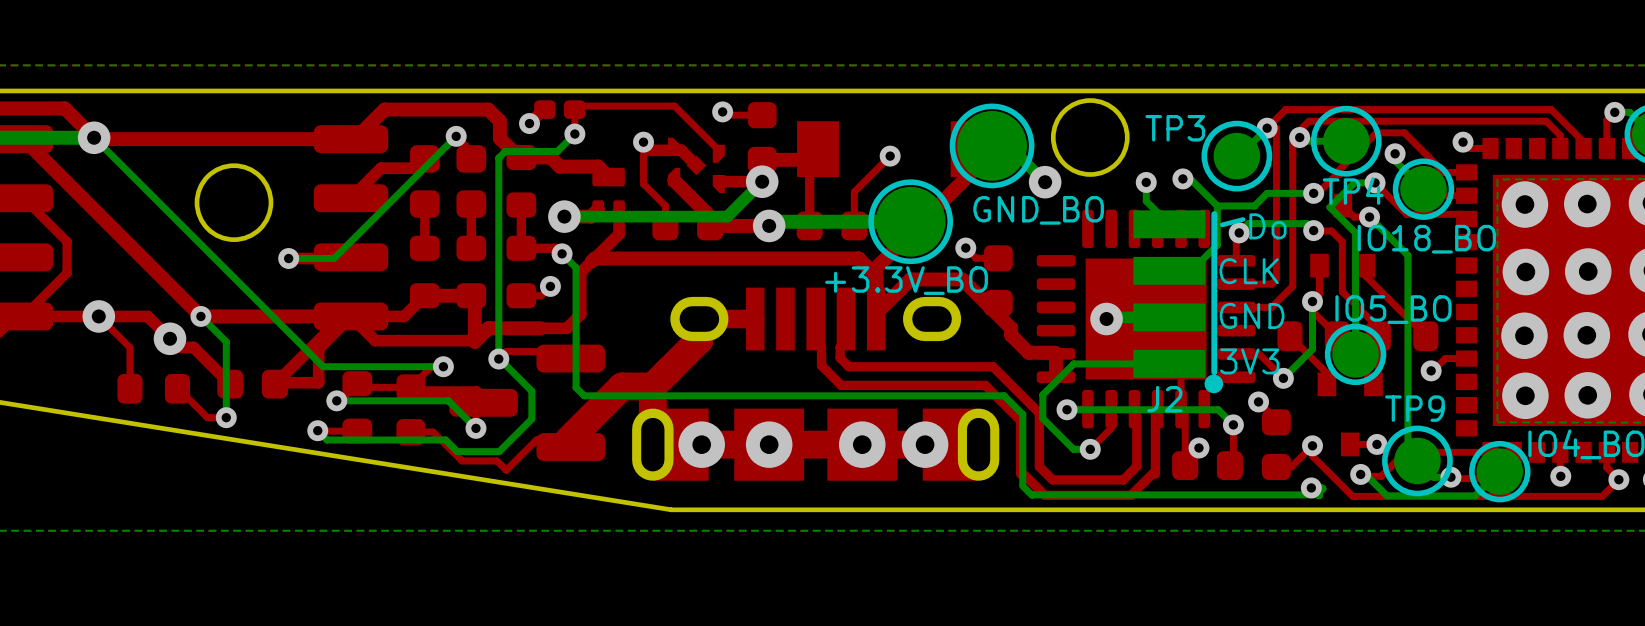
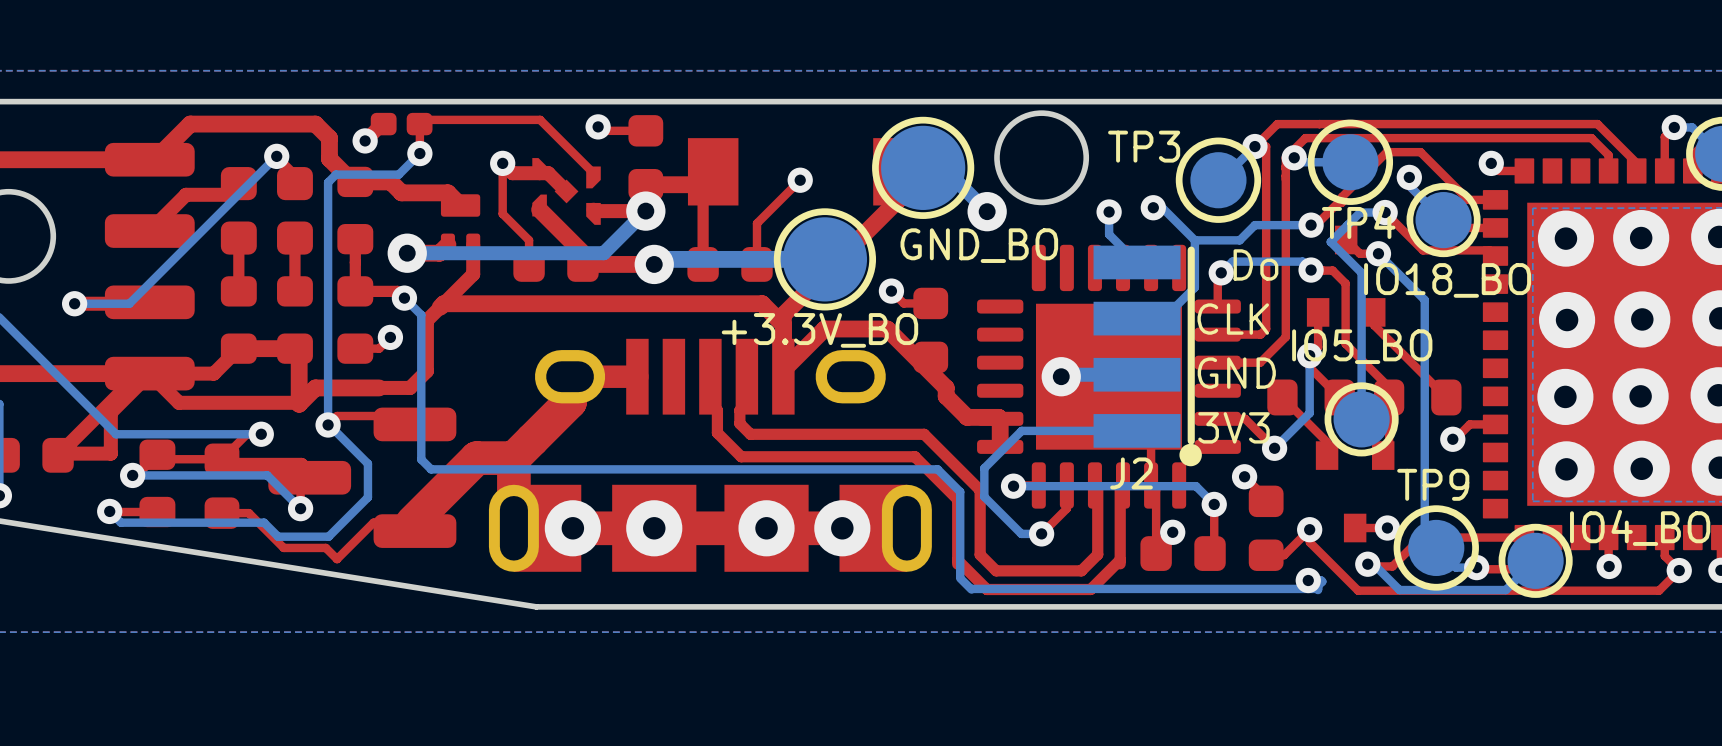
line: (1243, 219) (1222, 224) -> none
part value position: IO5_BO (1393, 309) -> IO5_BO (1362, 346)

